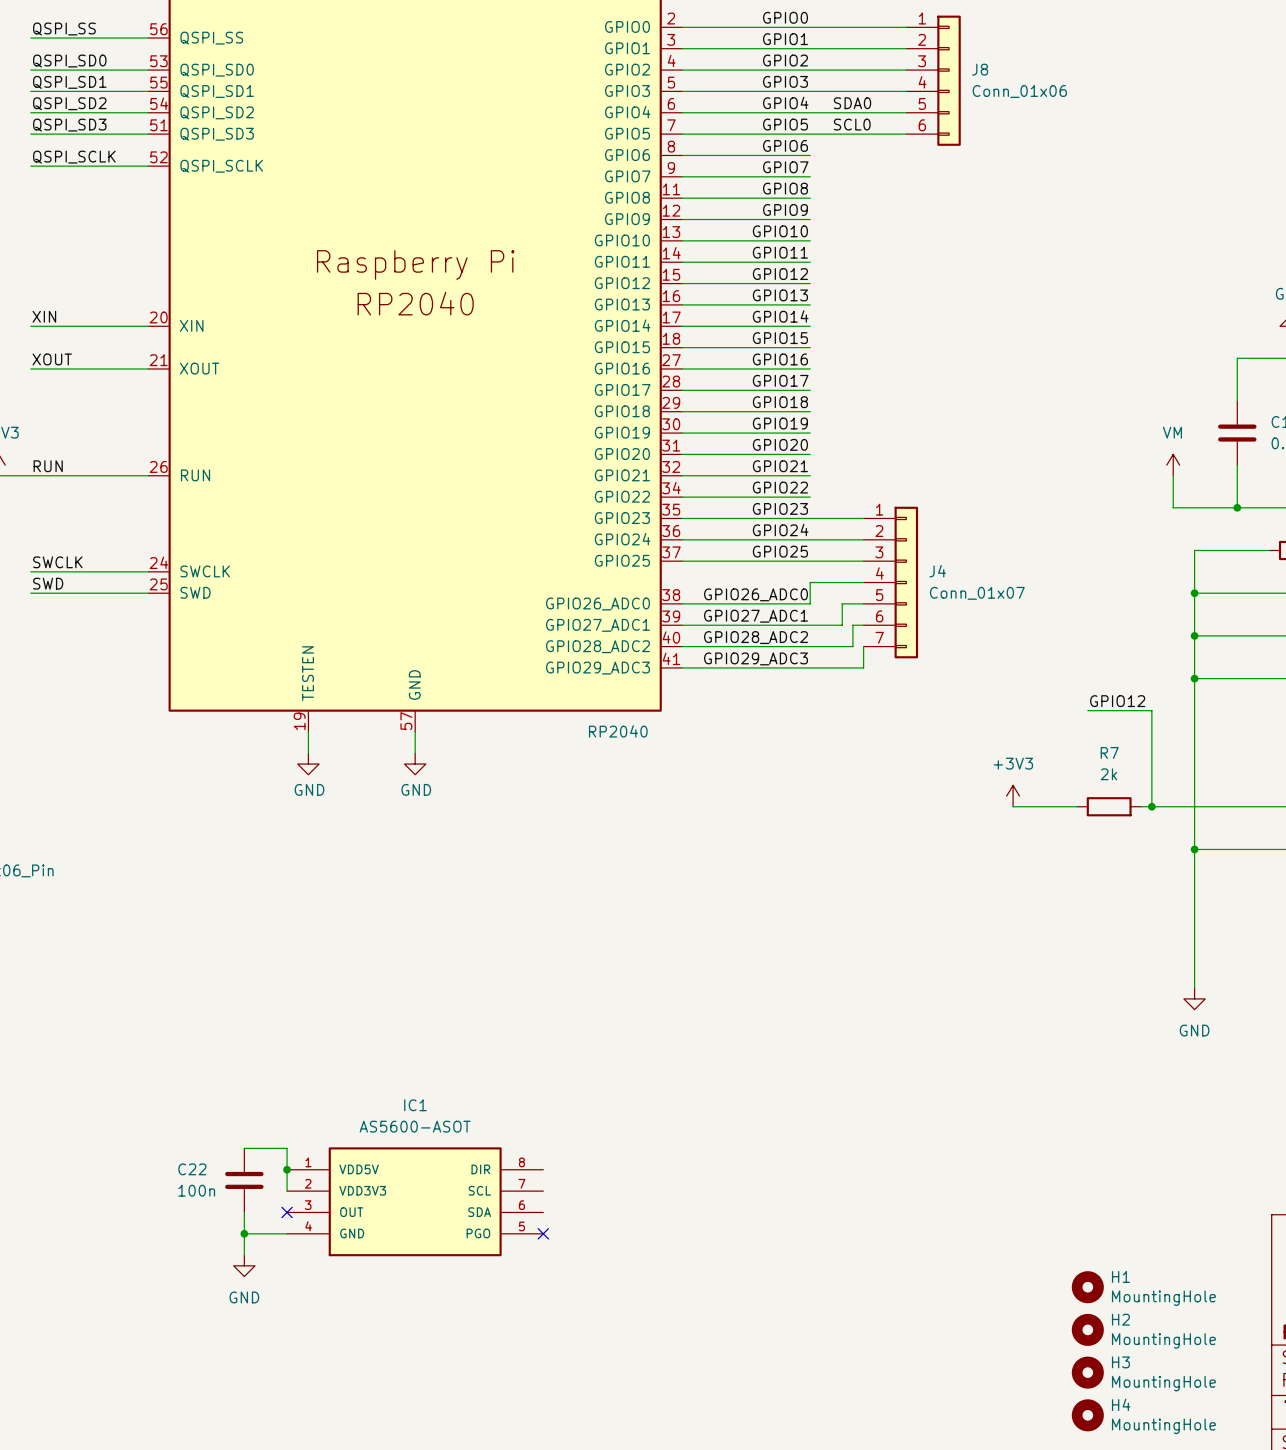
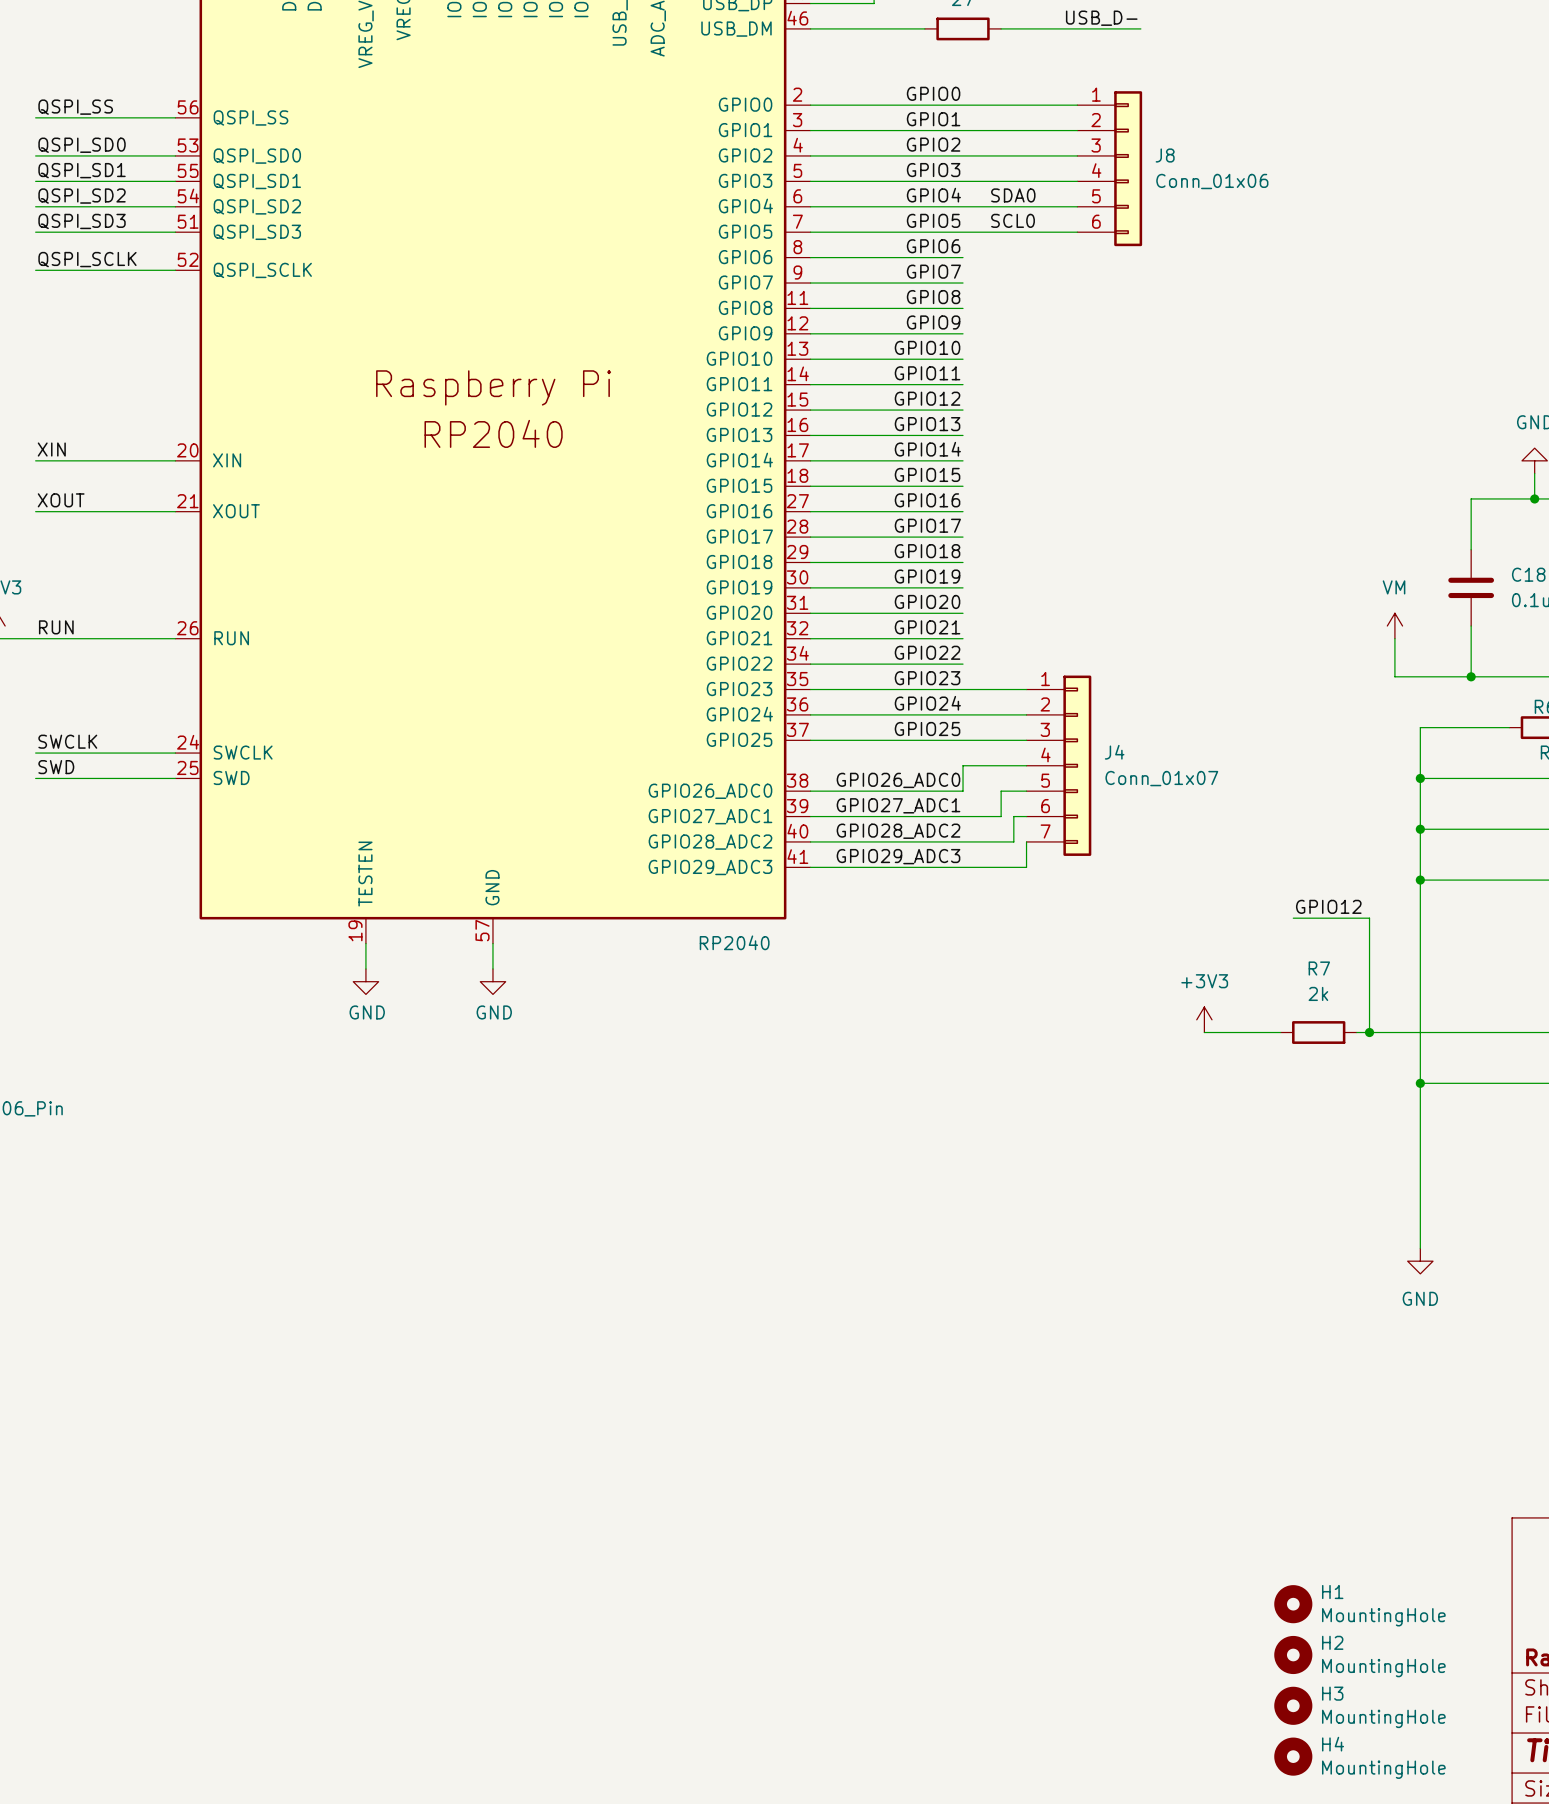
wire: (244, 1148) (287, 1148) (287, 1191) -> none
junction: (287, 1169) -> none
C22: 100n (244, 1180) -> none
IC1: AS5600-ASOT (415, 1201) -> none
wire: (244, 1212) (244, 1255) -> none
no-connect mark: (287, 1212) -> none
wire: (244, 1233) (287, 1233) -> none
junction: (244, 1233) -> none
no-connect mark: (543, 1233) -> none
power symbol: GND (244, 1265) -> none

